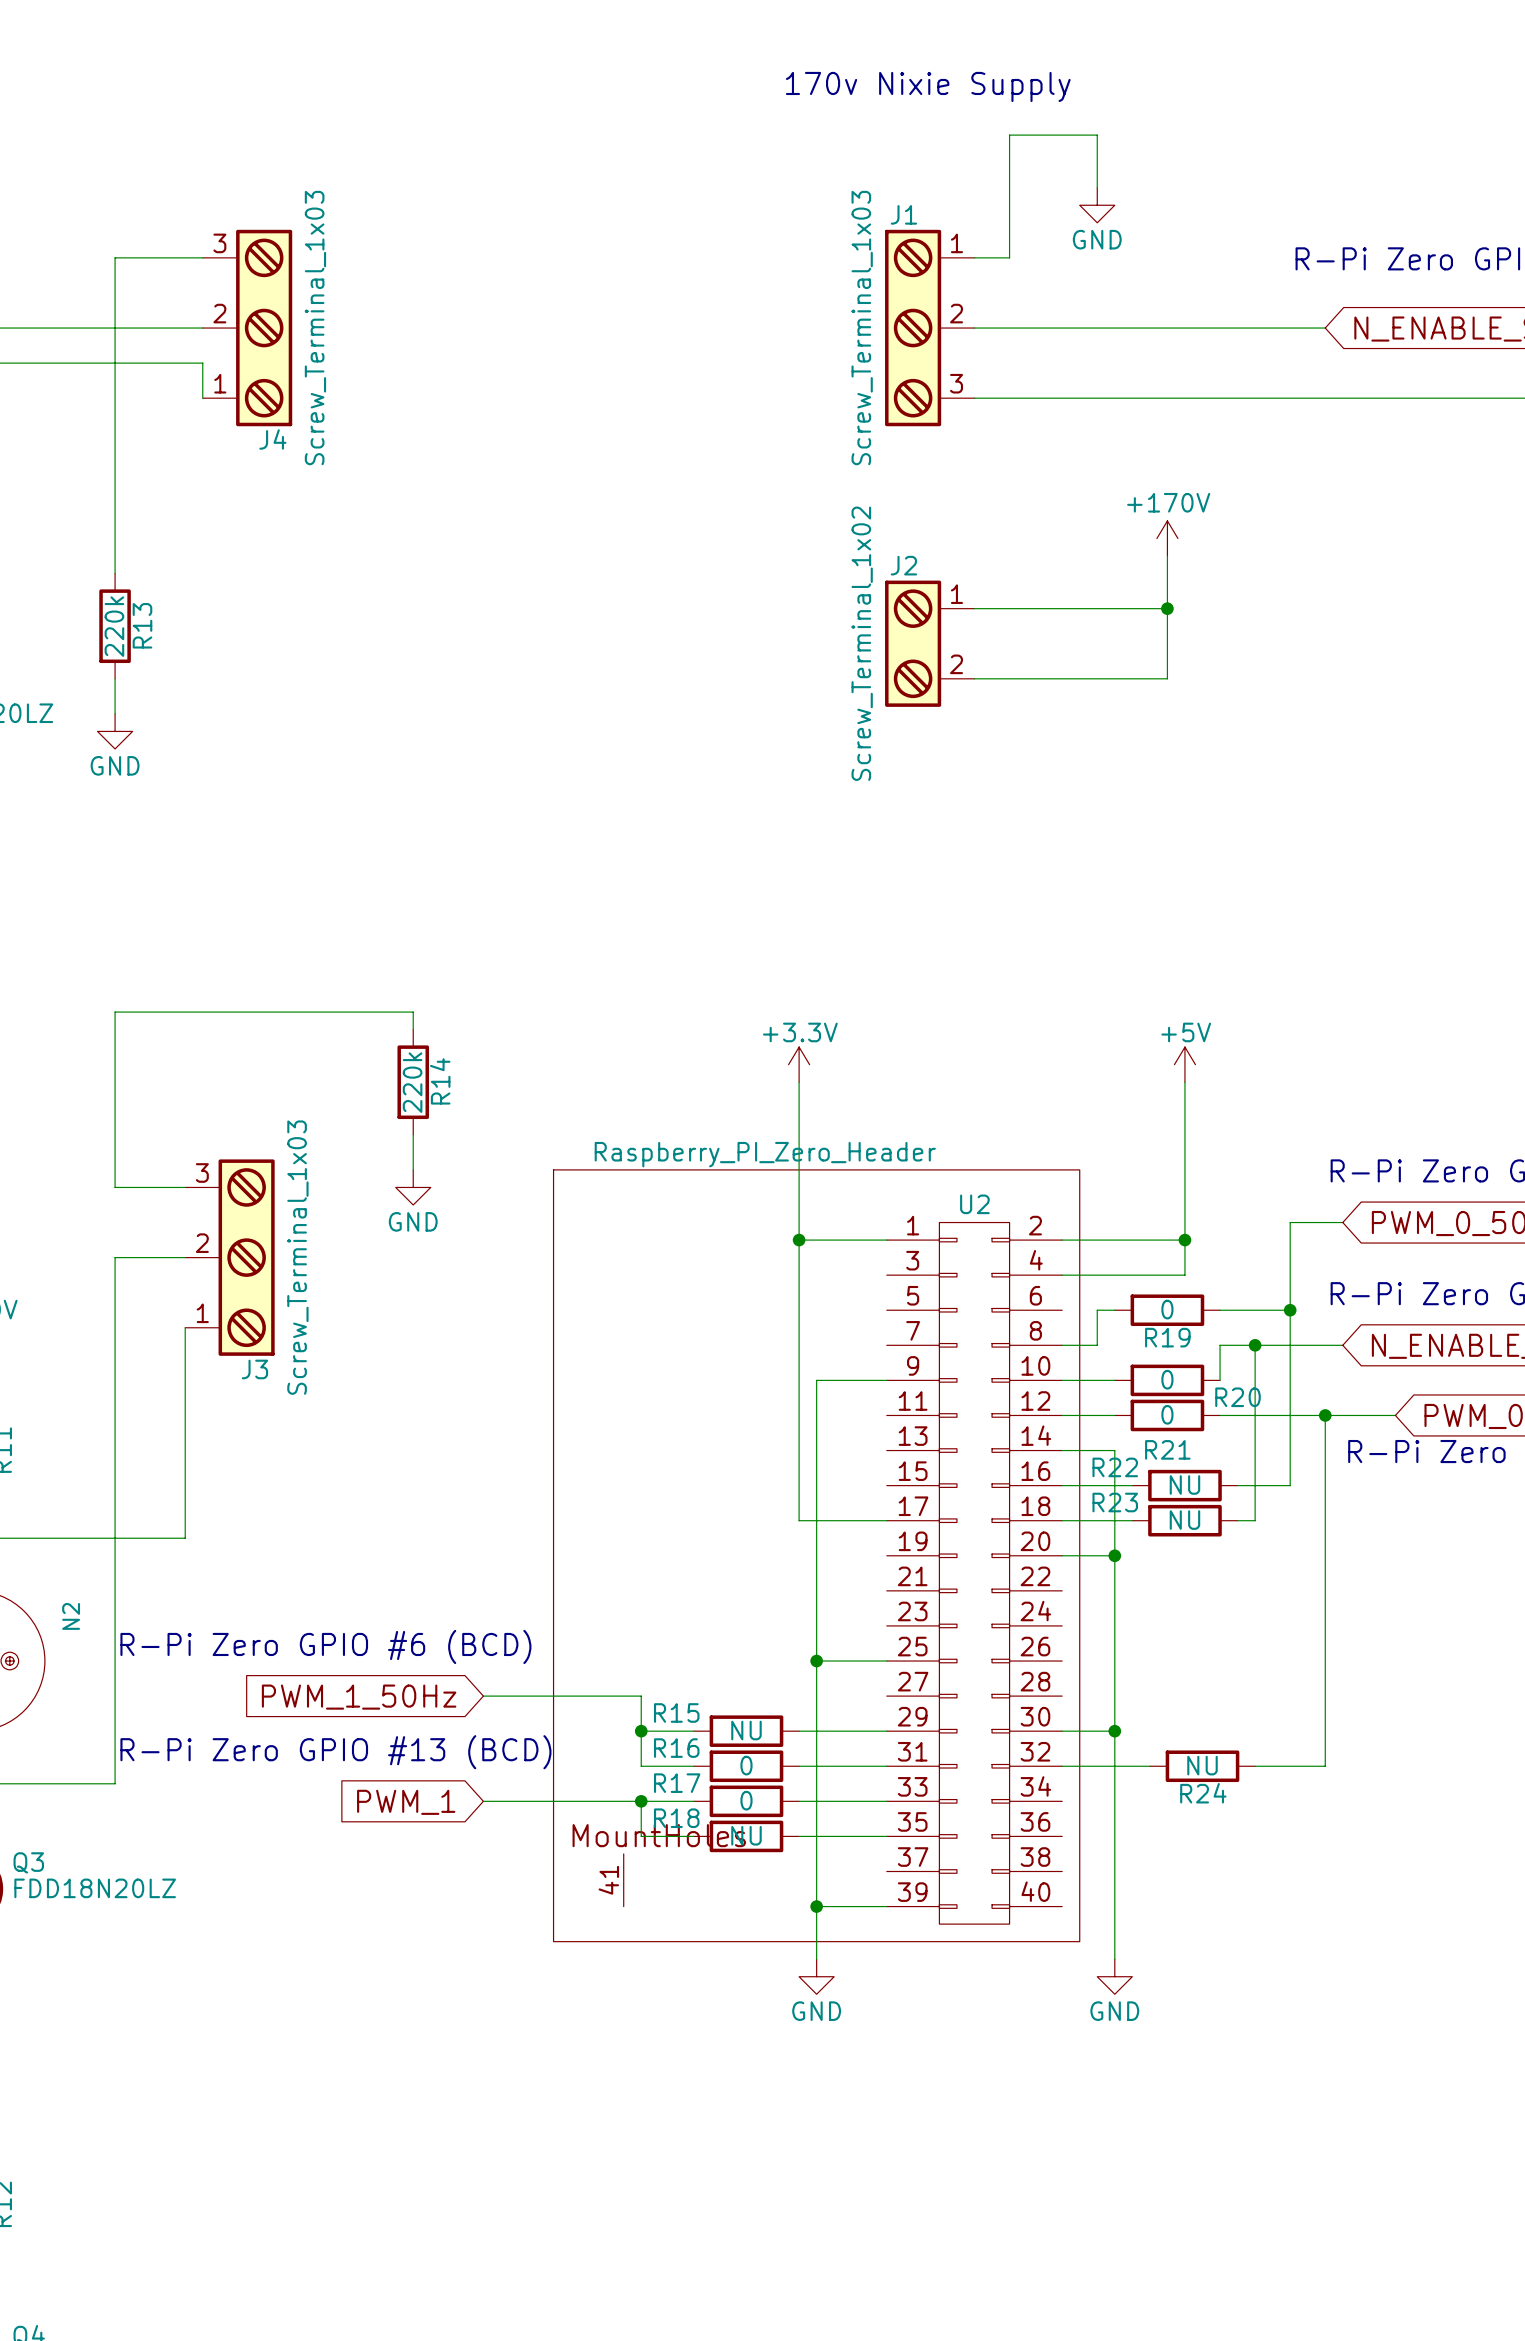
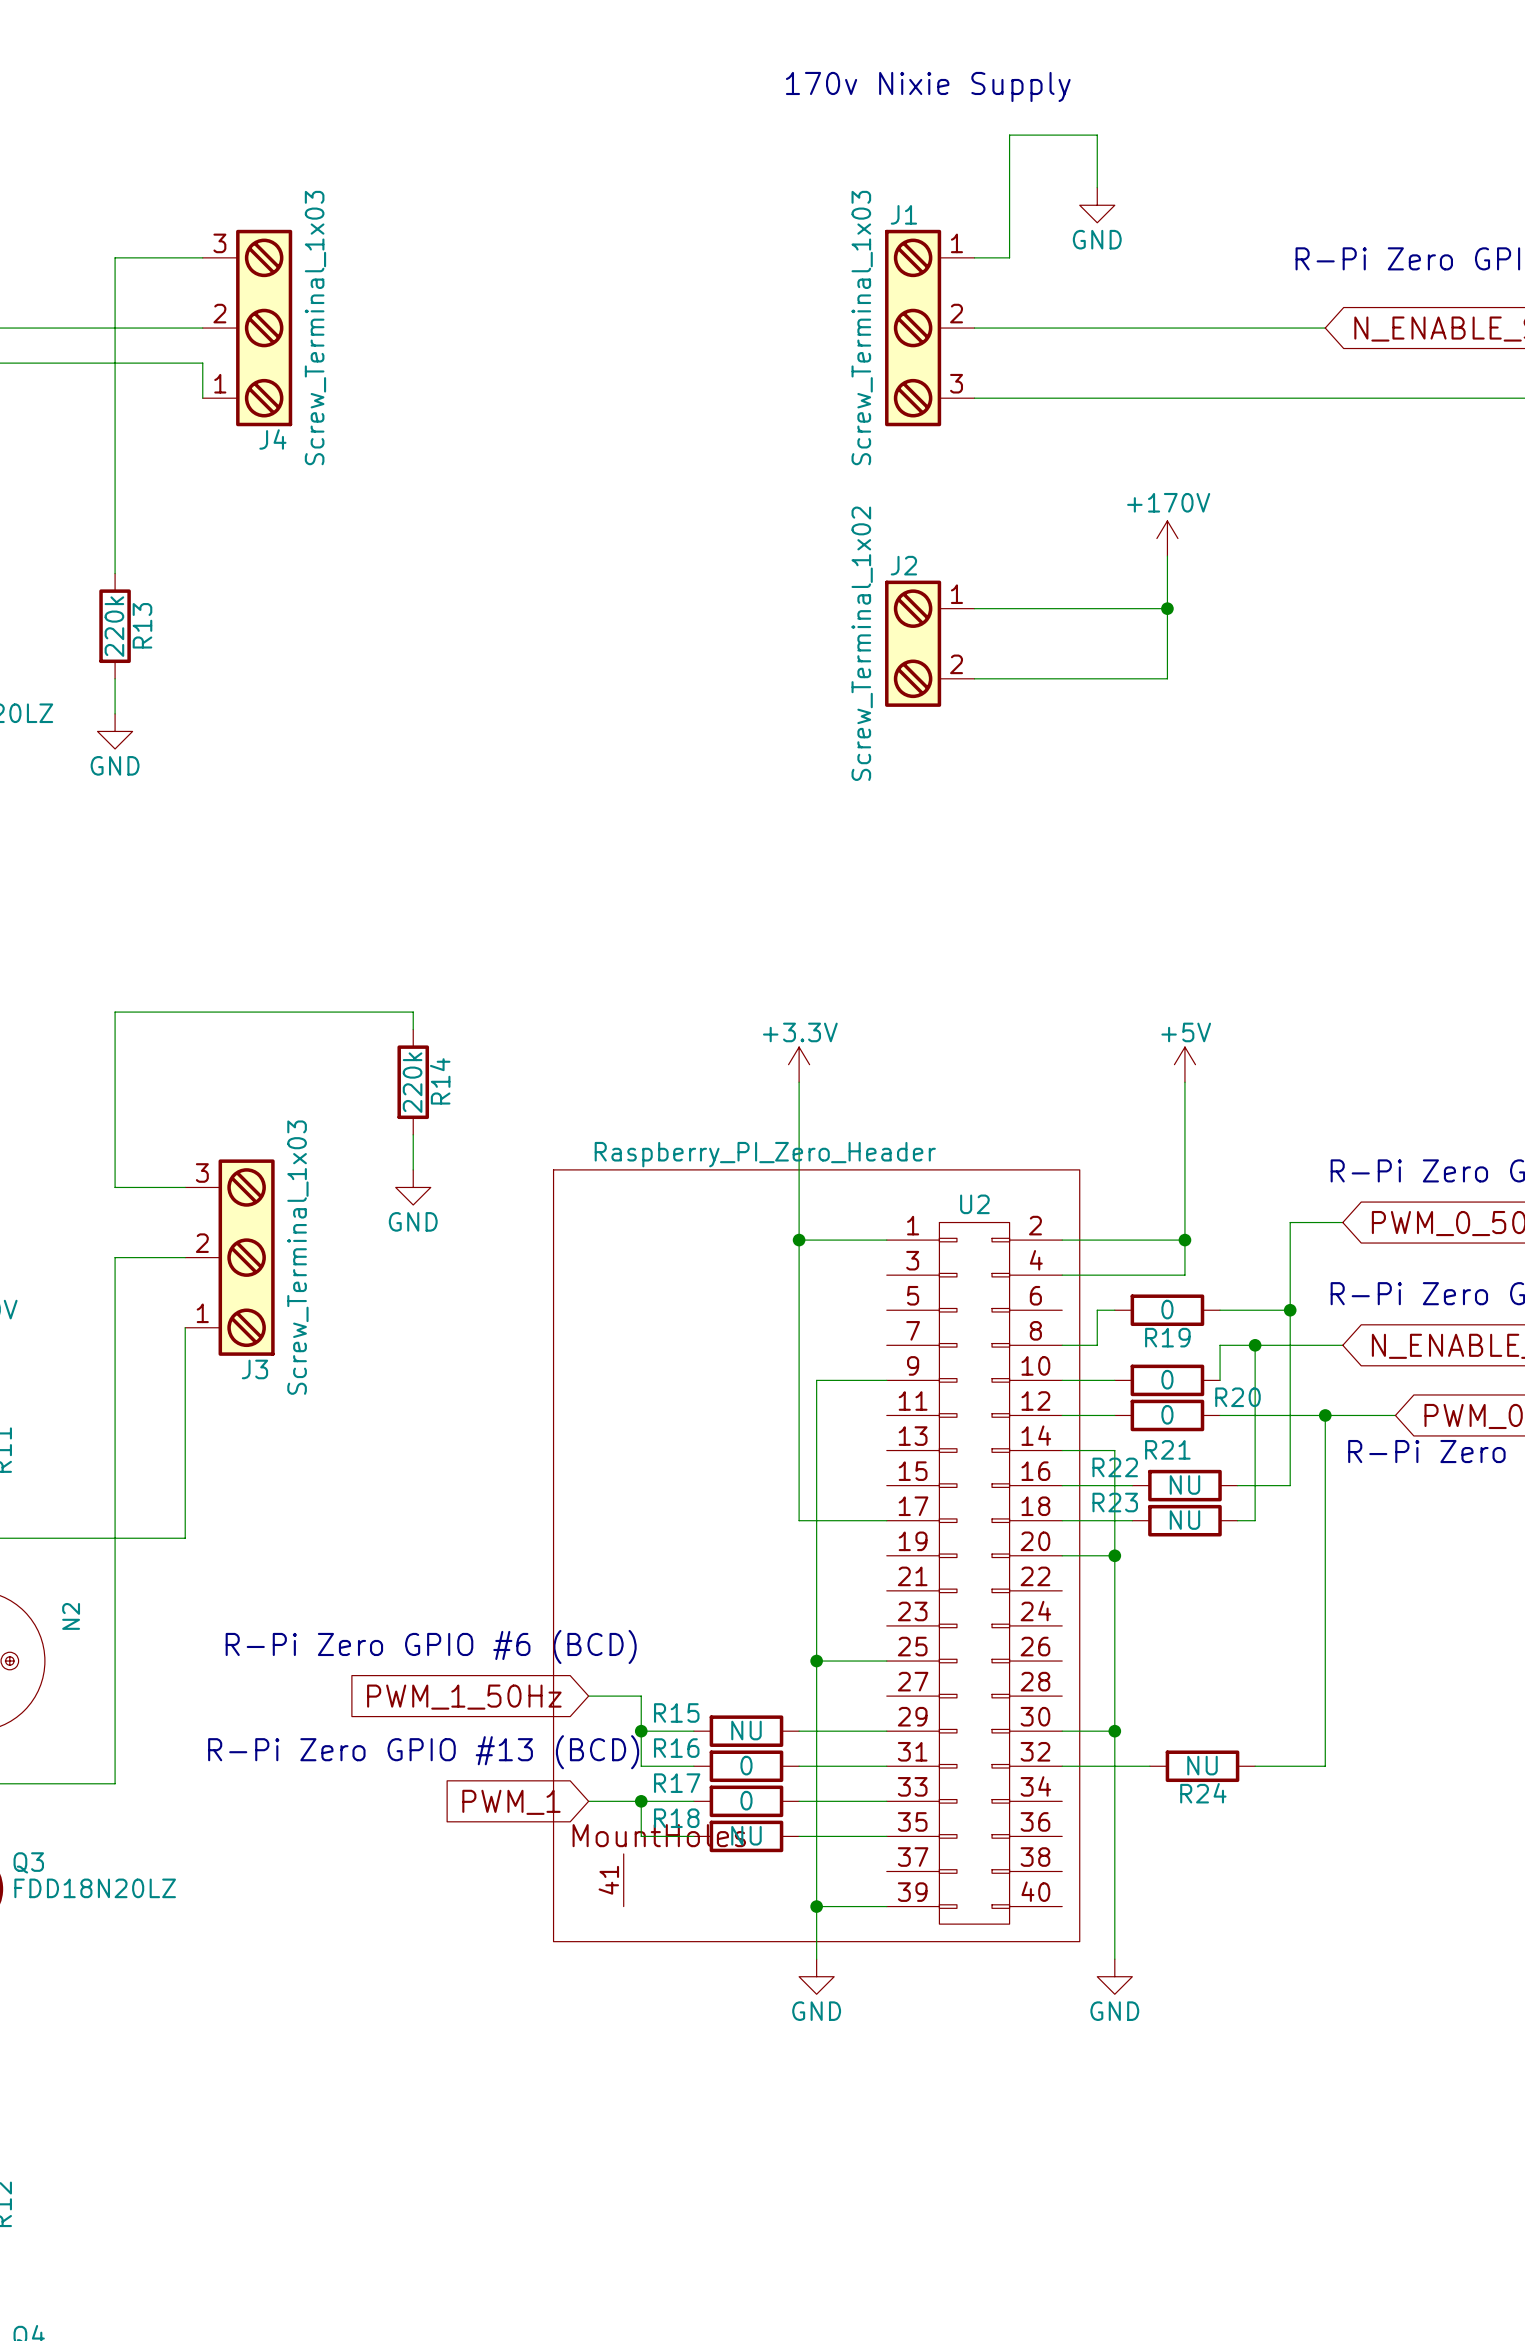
text position: R-Pi Zero GPIO #6 (BCD) (325, 1646) -> R-Pi Zero GPIO #6 (BCD) (431, 1646)
wire: (483, 1696) (588, 1696) -> none
global label position: PWM_1_50Hz (359, 1697) -> PWM_1_50Hz (464, 1697)
text position: R-Pi Zero GPIO #13 (BCD) (335, 1752) -> R-Pi Zero GPIO #13 (BCD) (423, 1752)
wire: (483, 1801) (588, 1801) -> none
global label position: PWM_1 (406, 1802) -> PWM_1 (511, 1802)

